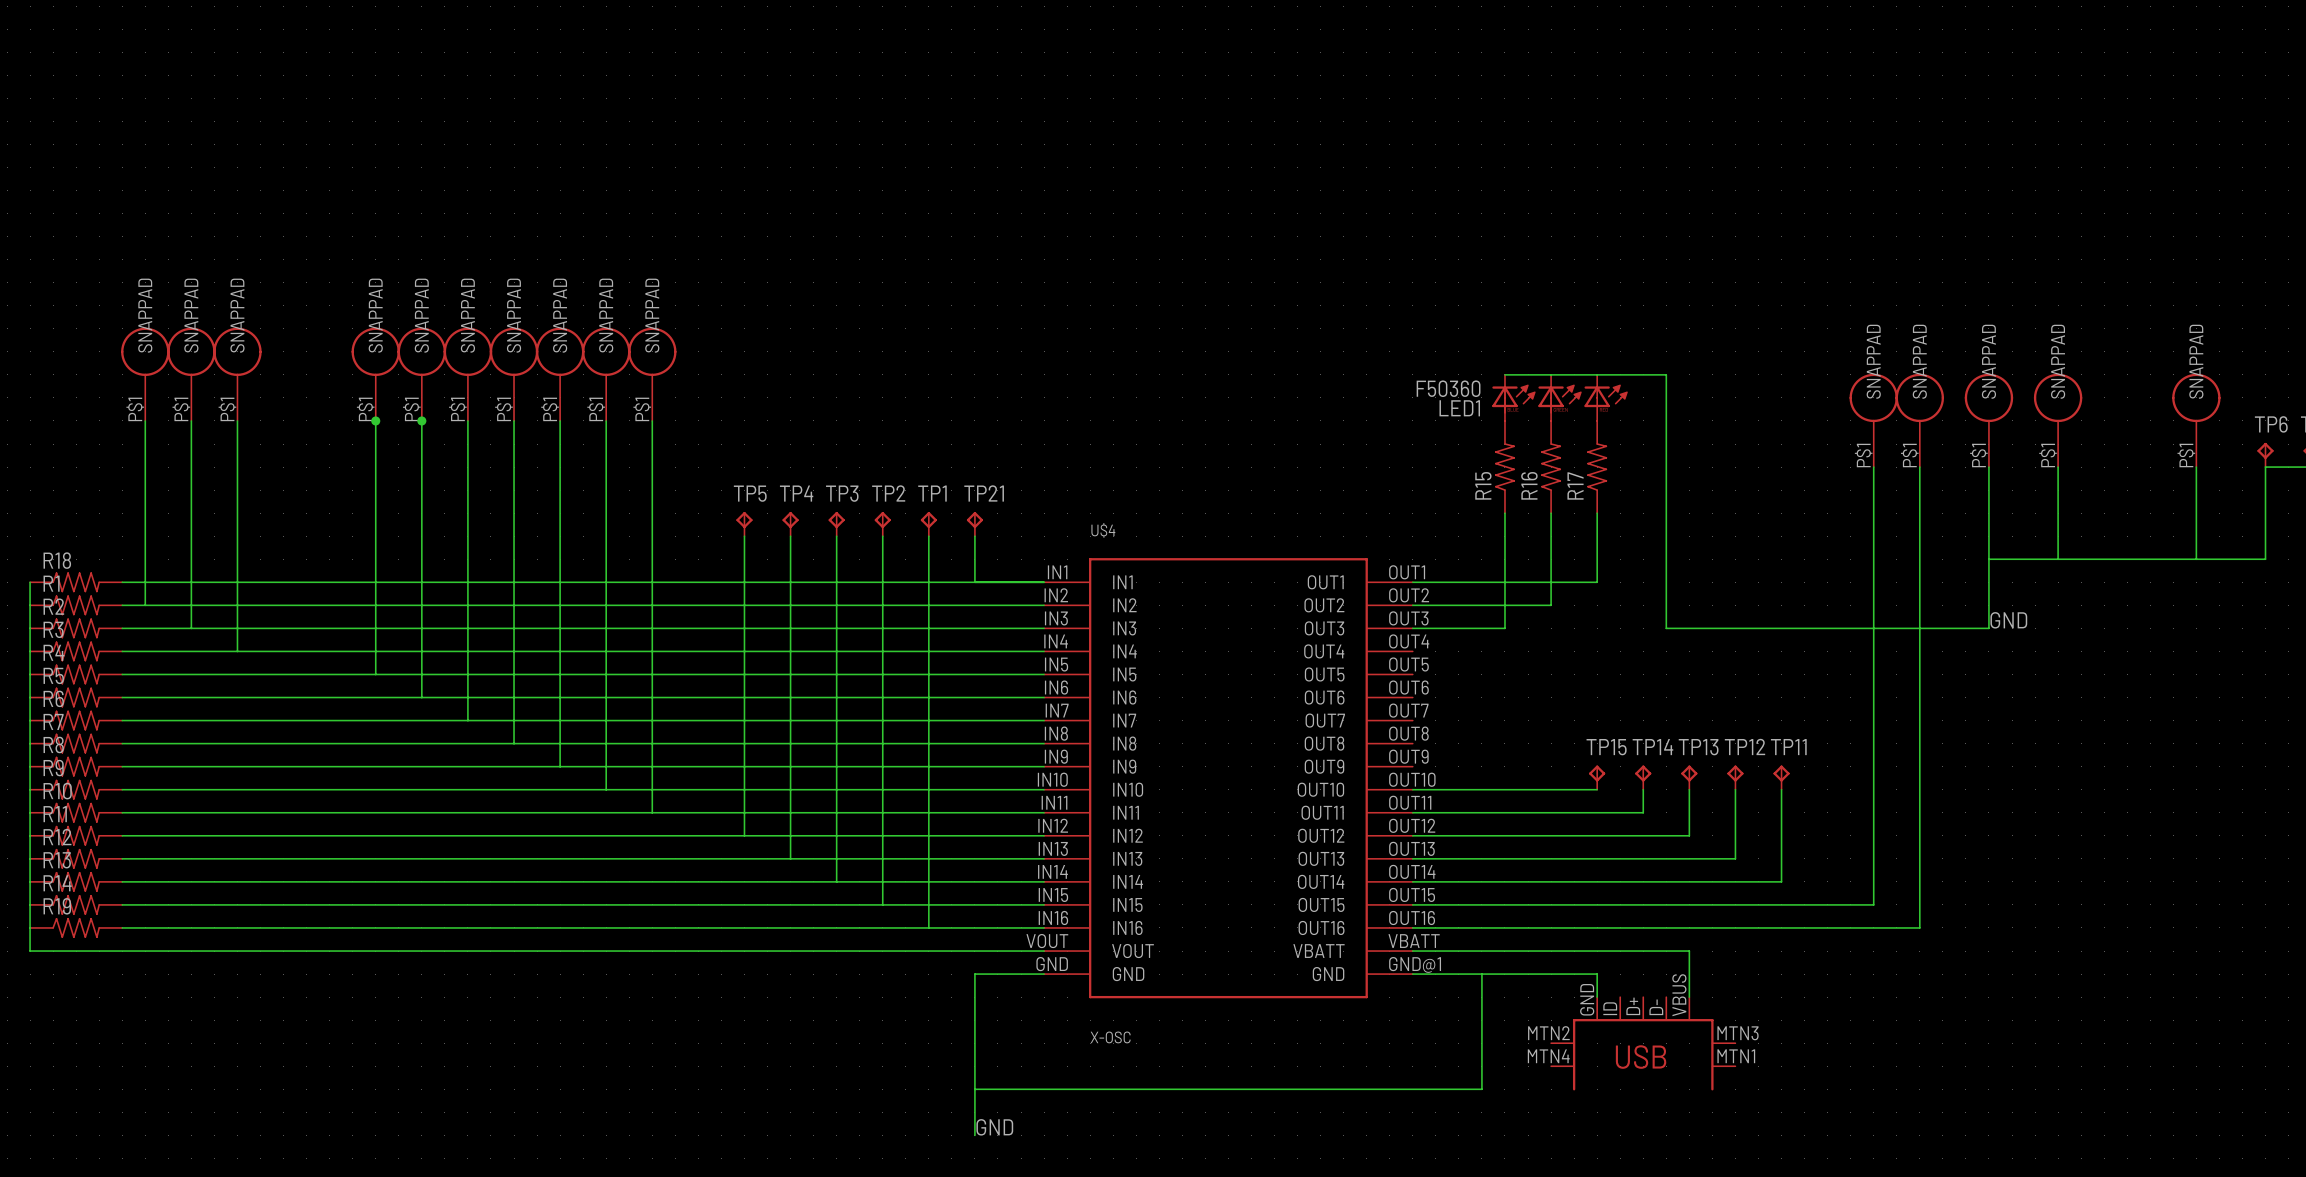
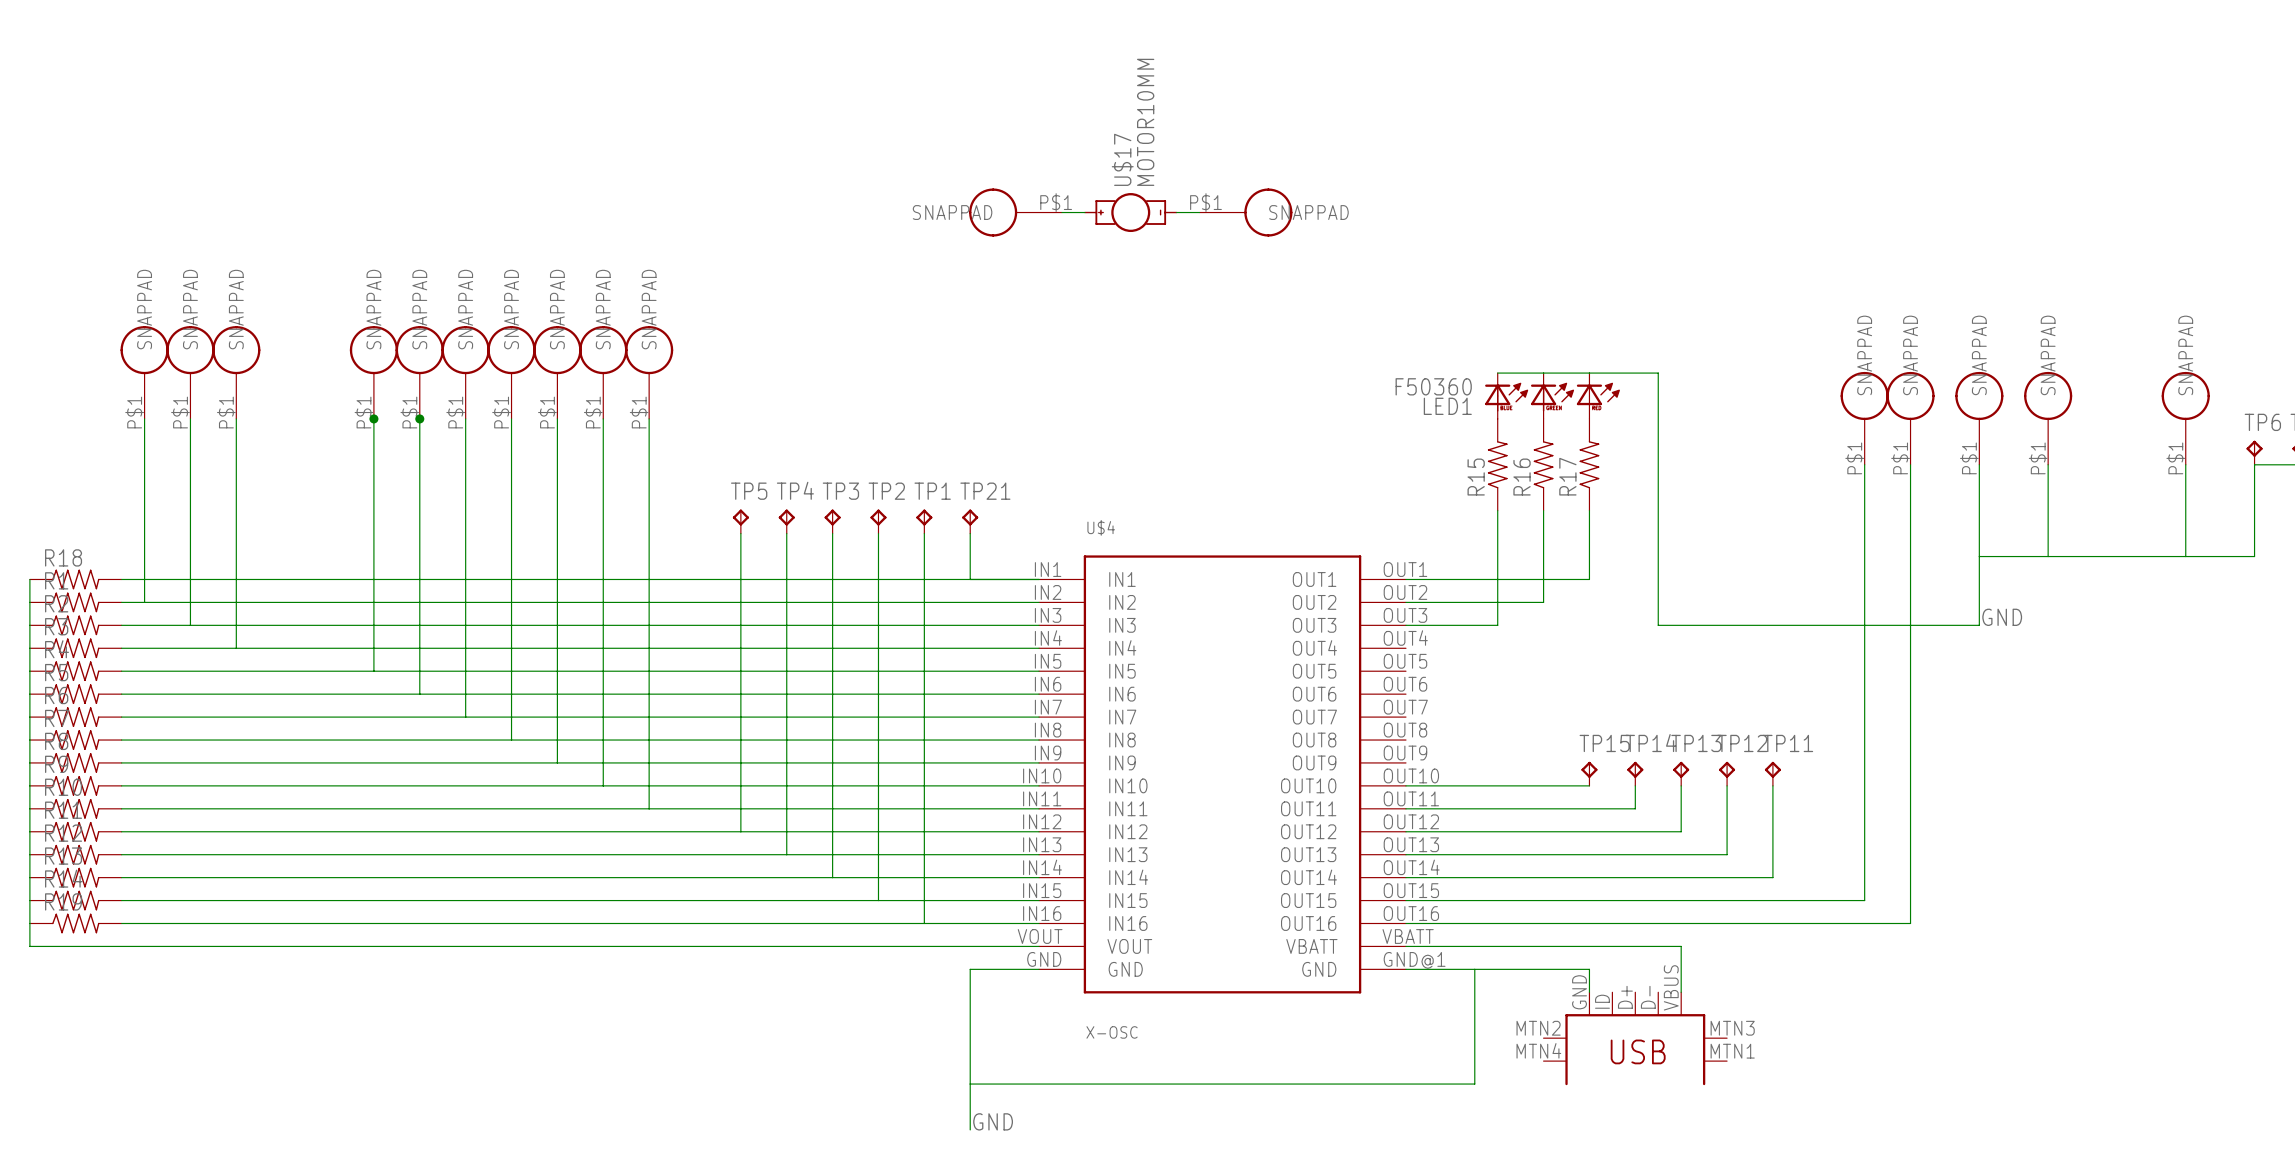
part: none -> (1015, 212)
wire: none -> (1061, 212) (1084, 212)
U$17: none -> MOTOR10MM (1130, 212)
wire: none -> (1176, 212) (1199, 212)
part: none -> (1246, 212)

